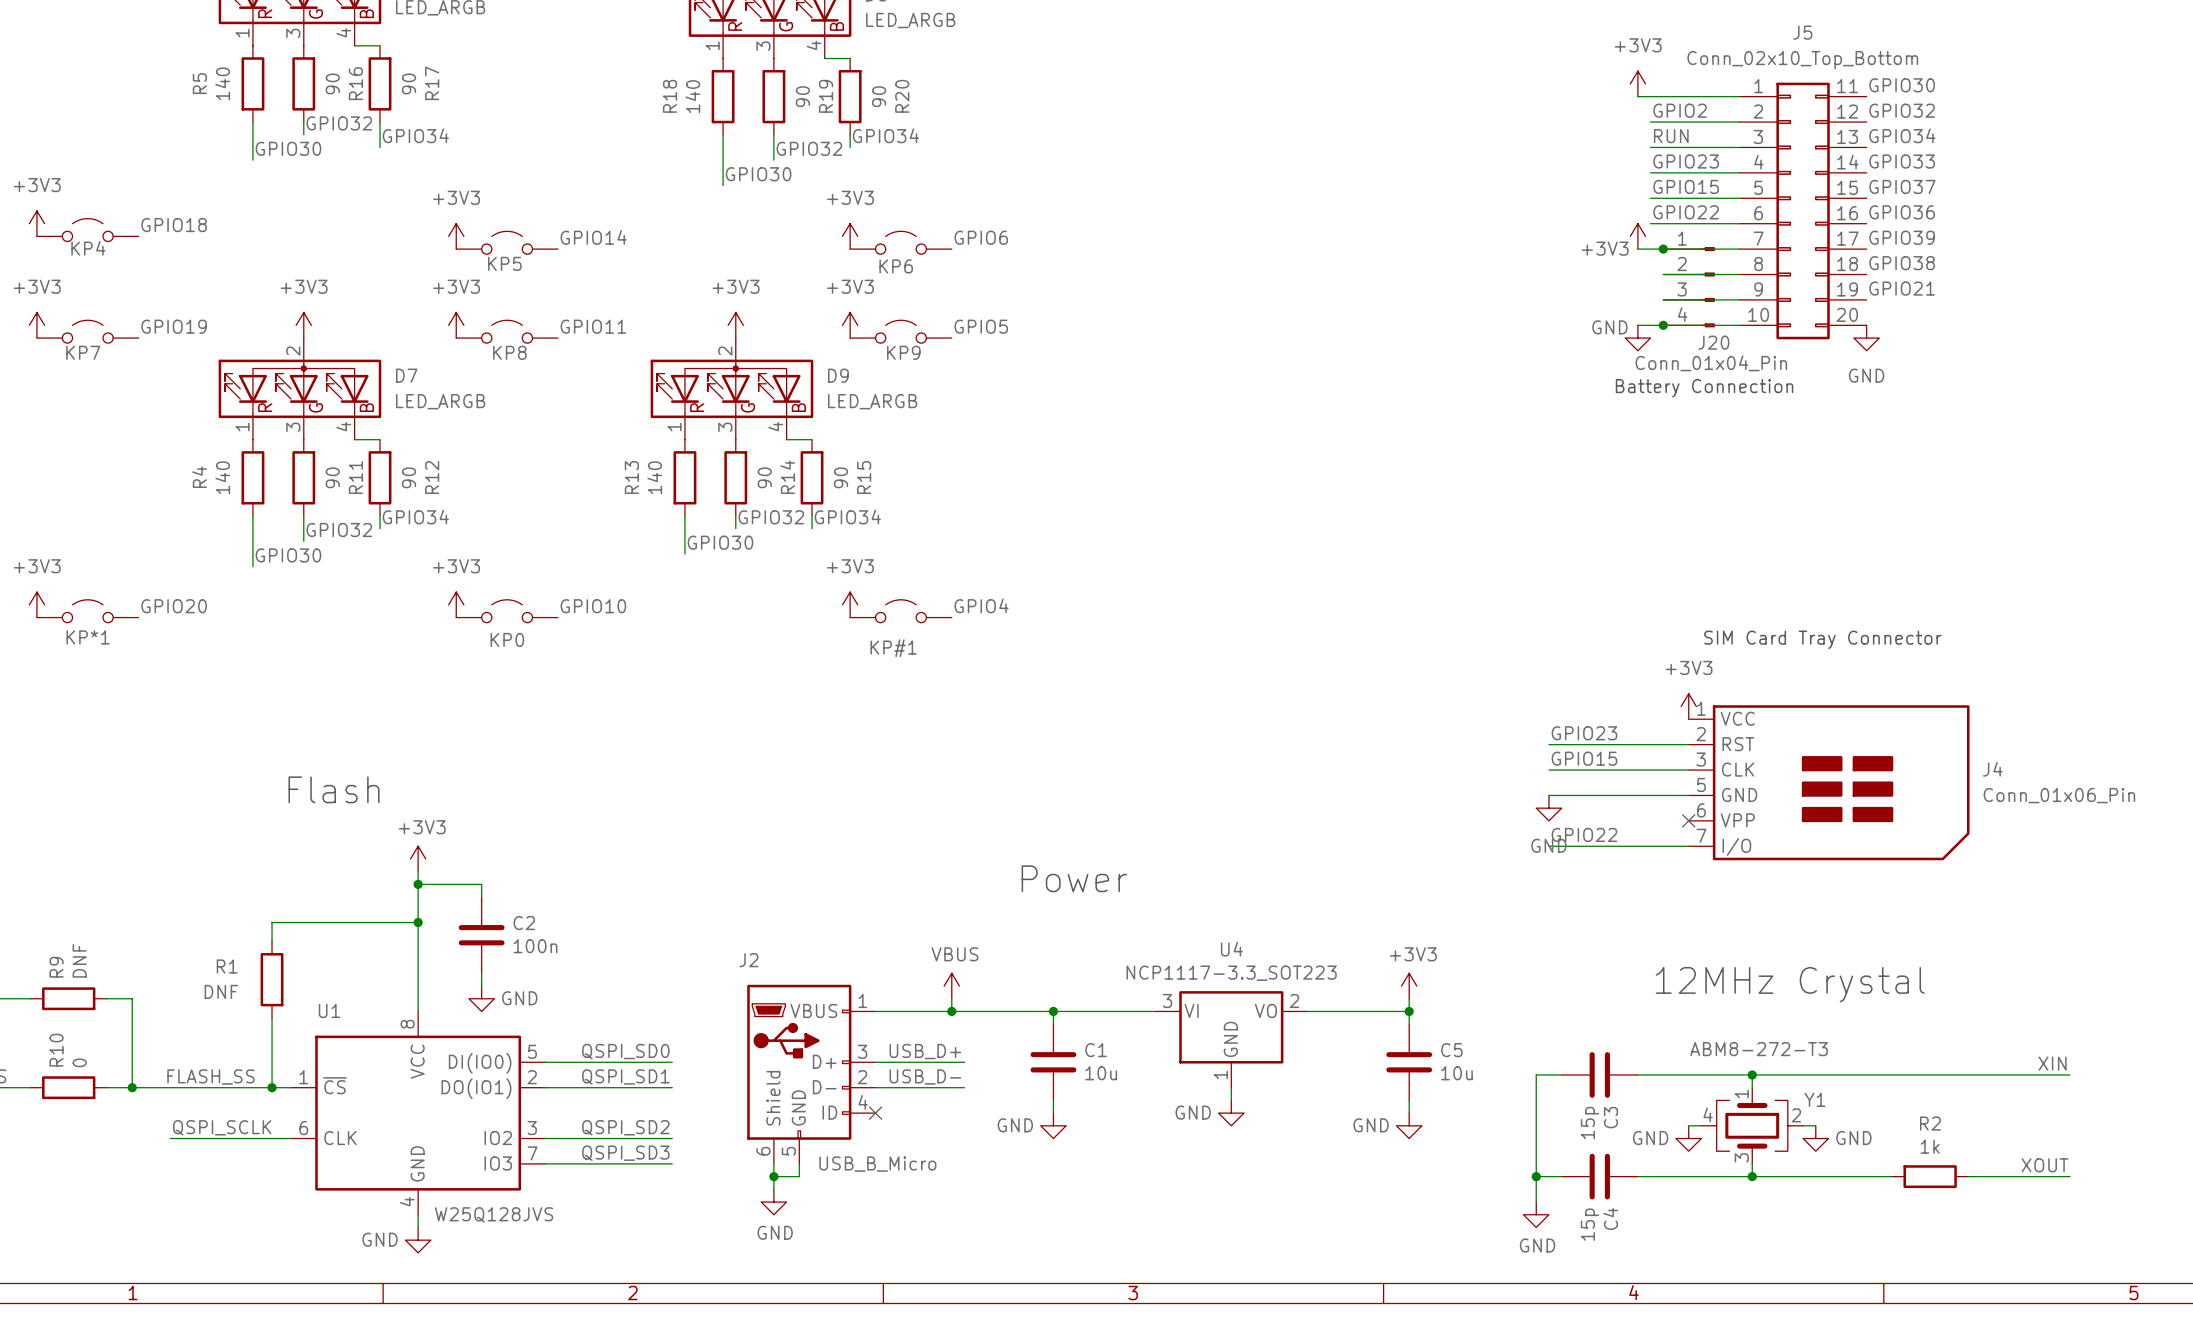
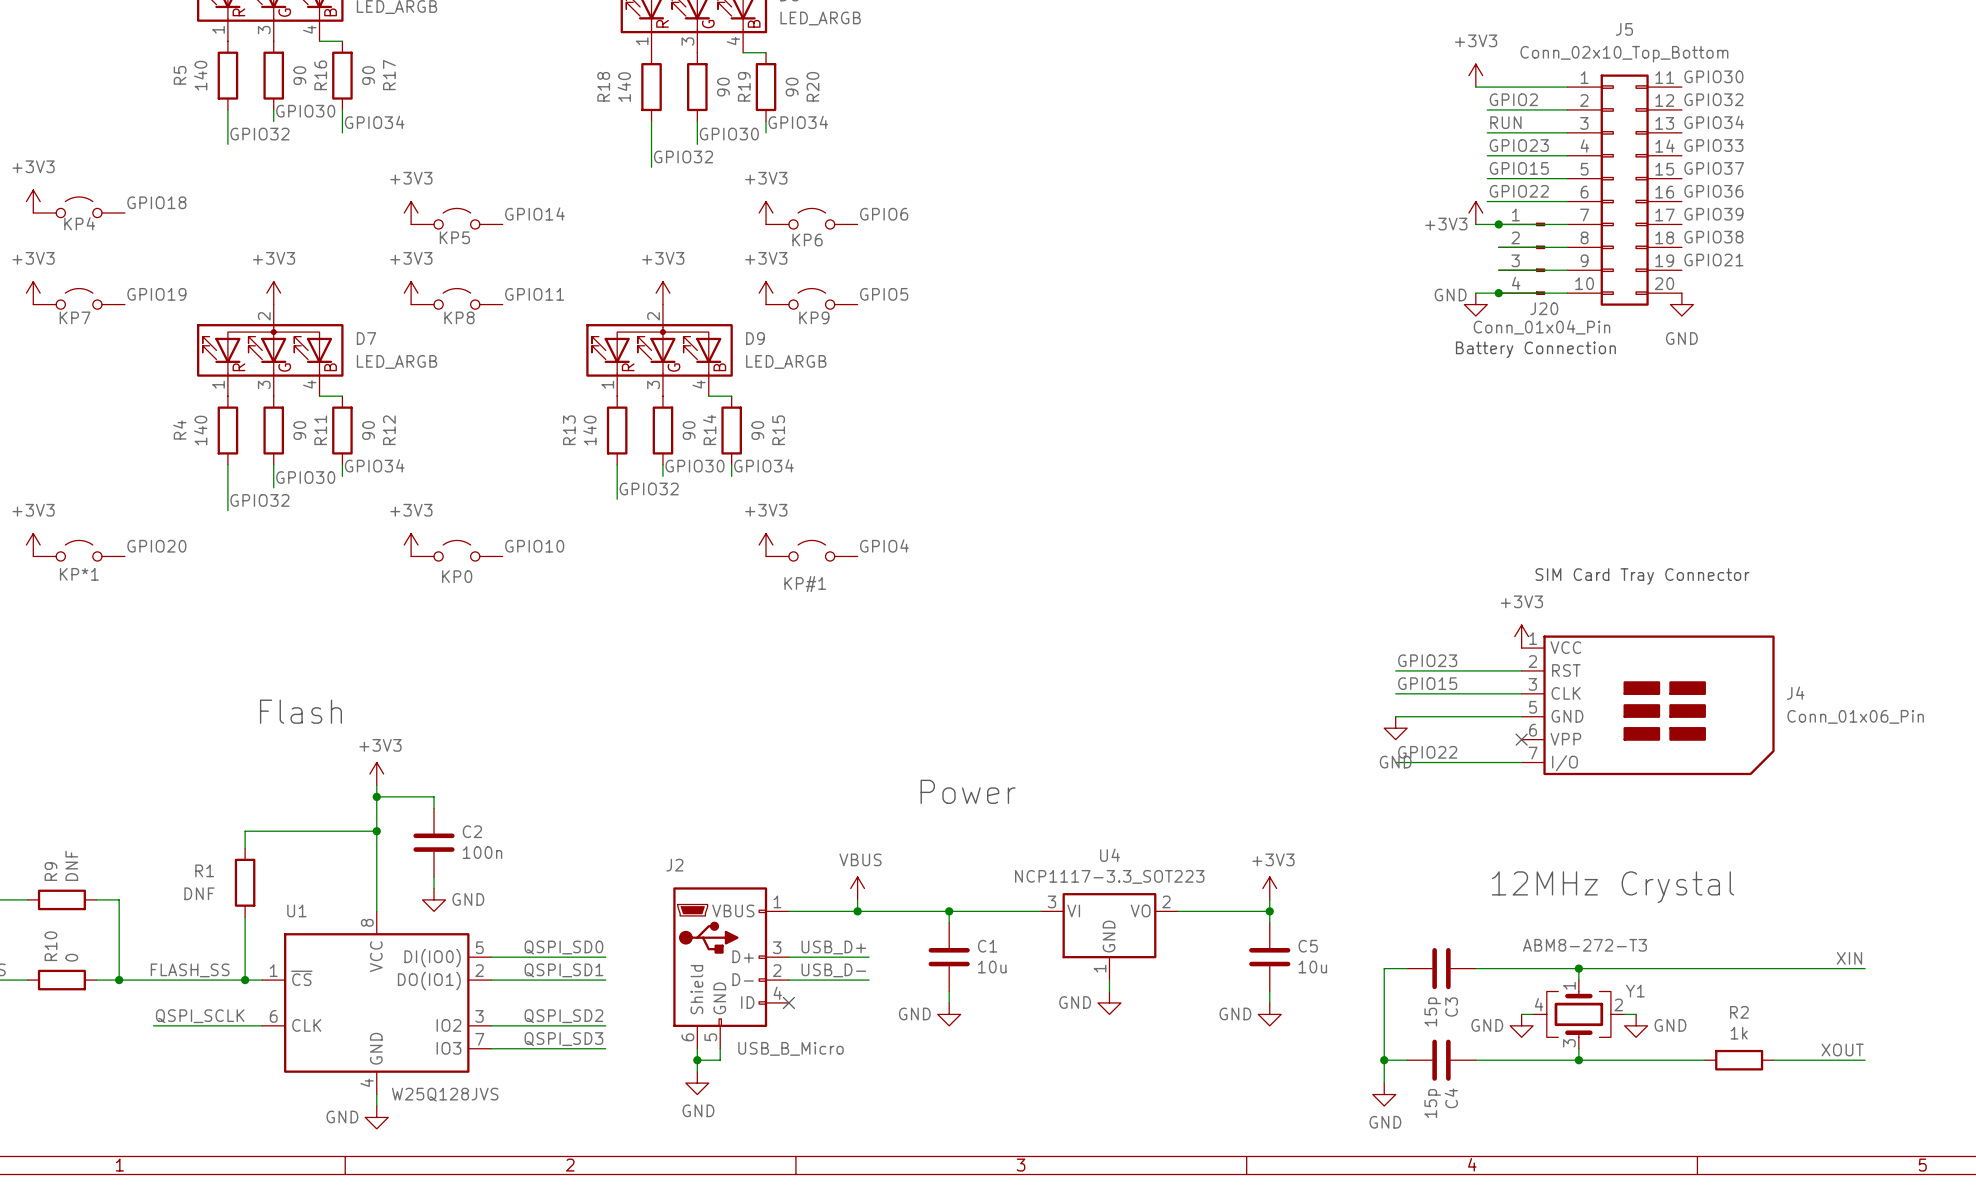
label: GPIO32 (339, 123) -> GPIO30 (305, 111)
label: GPIO30 (288, 148) -> GPIO32 (259, 134)
label: GPIO32 (809, 148) -> GPIO30 (729, 134)
label: GPIO30 (758, 174) -> GPIO32 (683, 156)
label: GPIO32 (771, 517) -> GPIO30 (694, 466)
label: GPIO32 (339, 530) -> GPIO30 (305, 477)
label: GPIO30 (720, 542) -> GPIO32 (649, 489)
label: GPIO30 (288, 555) -> GPIO32 (259, 500)

